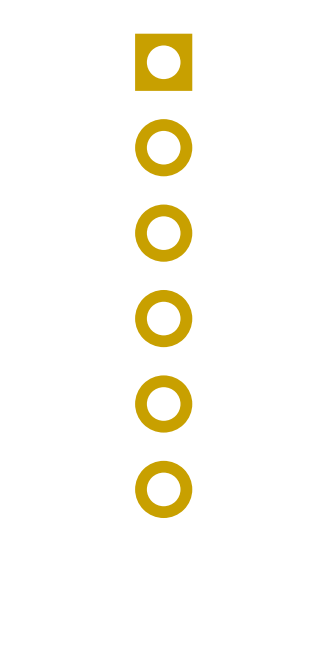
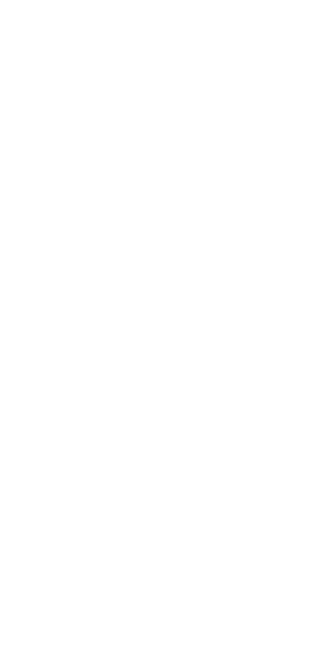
part: (163, 275) -> none

